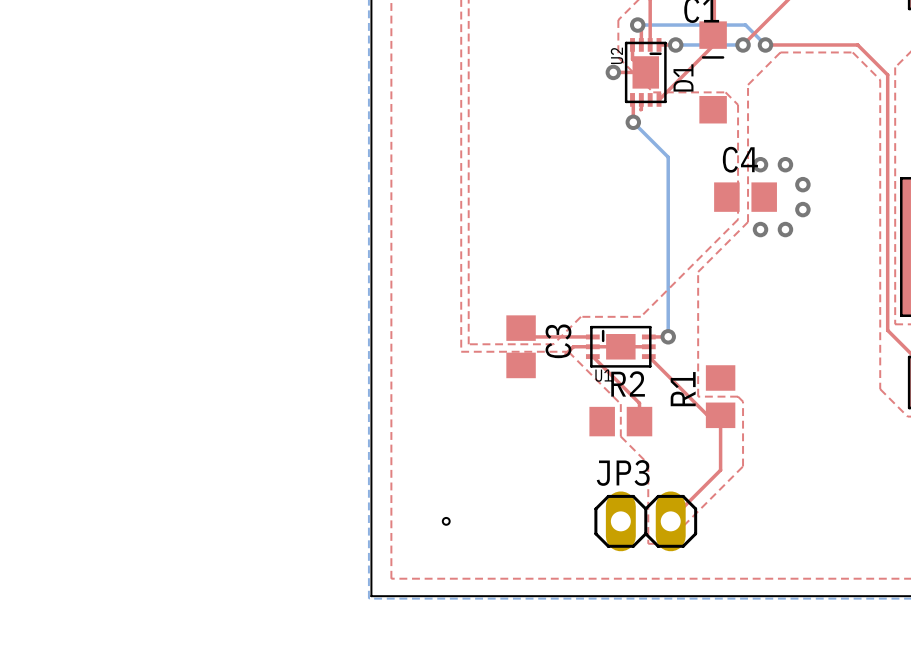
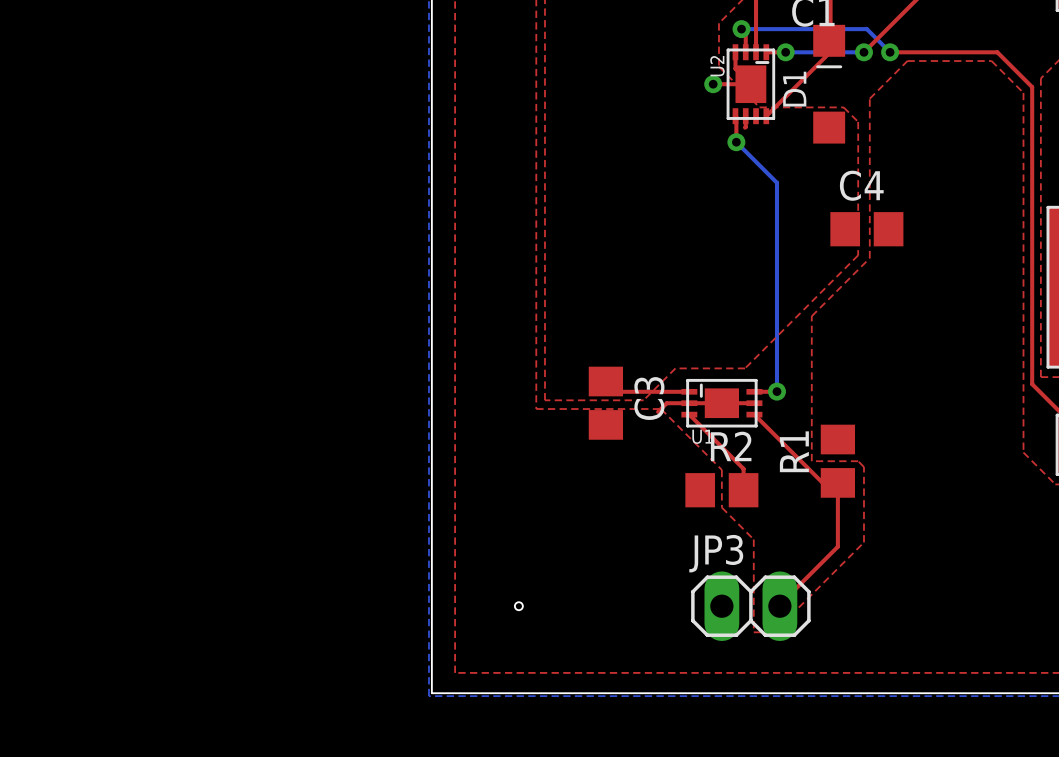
via: (760, 164) -> none
via: (785, 164) -> none
via: (802, 184) -> none
via: (802, 209) -> none
via: (760, 229) -> none
via: (785, 229) -> none

